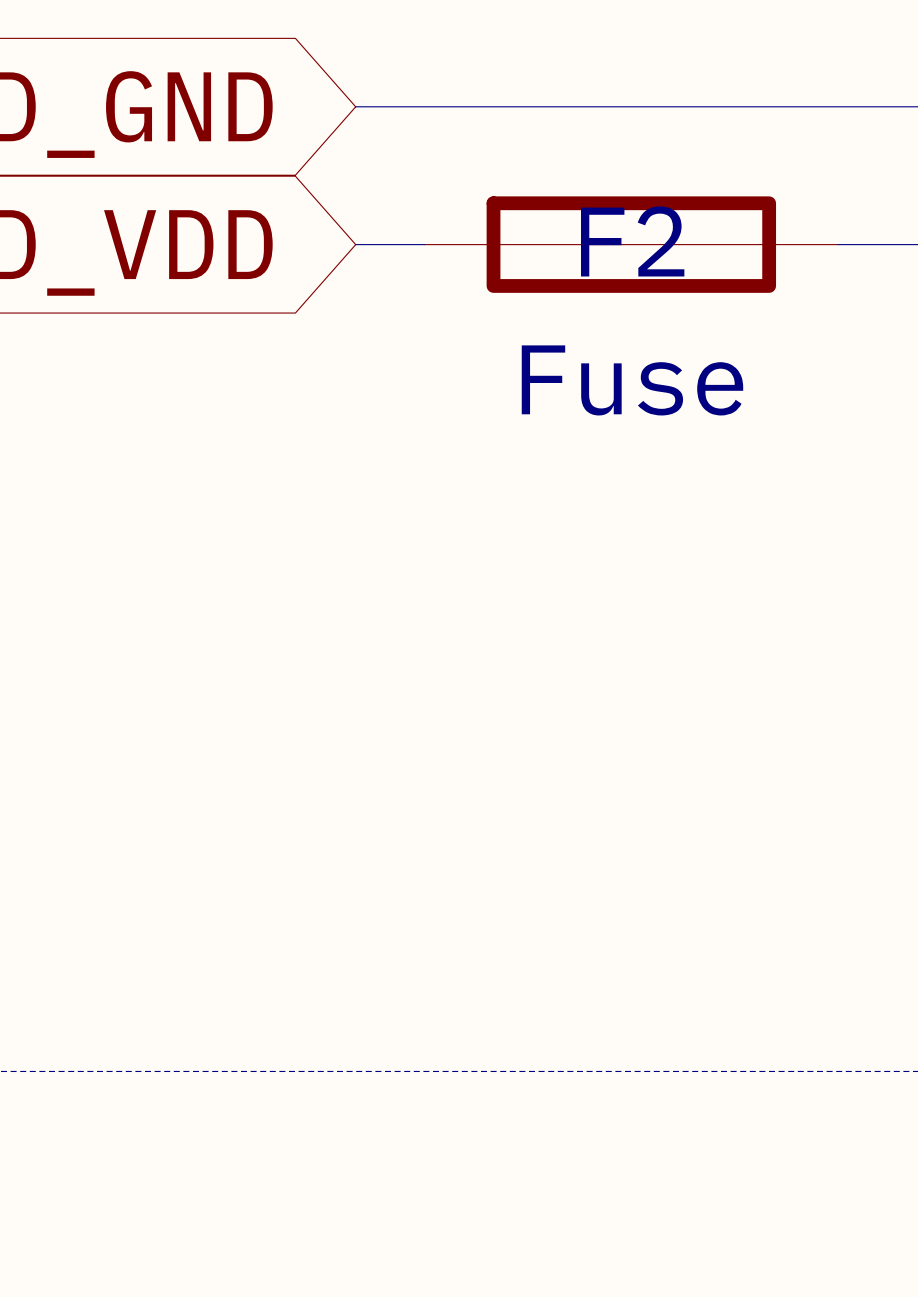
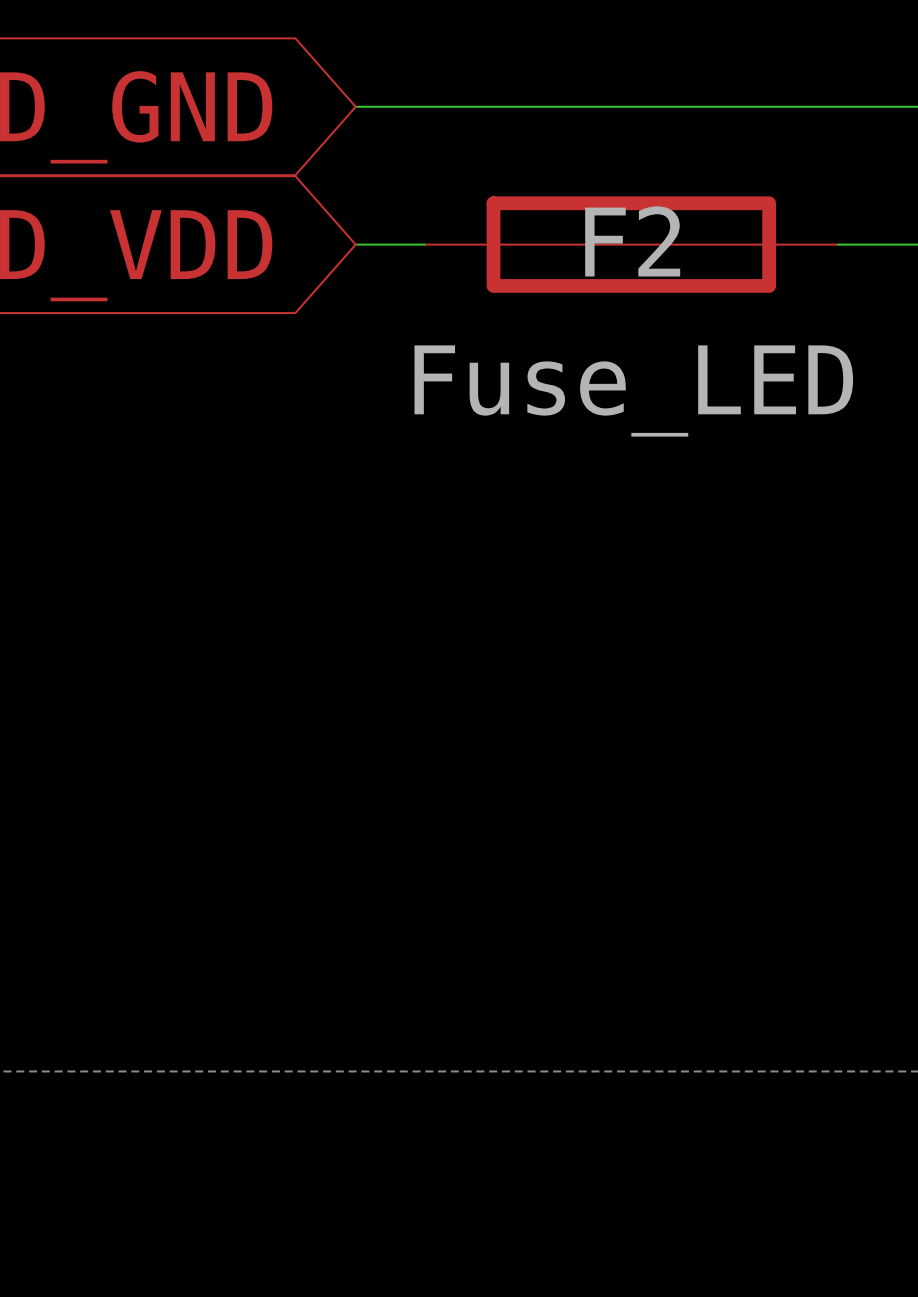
F2 value: Fuse (632, 380) -> Fuse_LED (633, 390)

